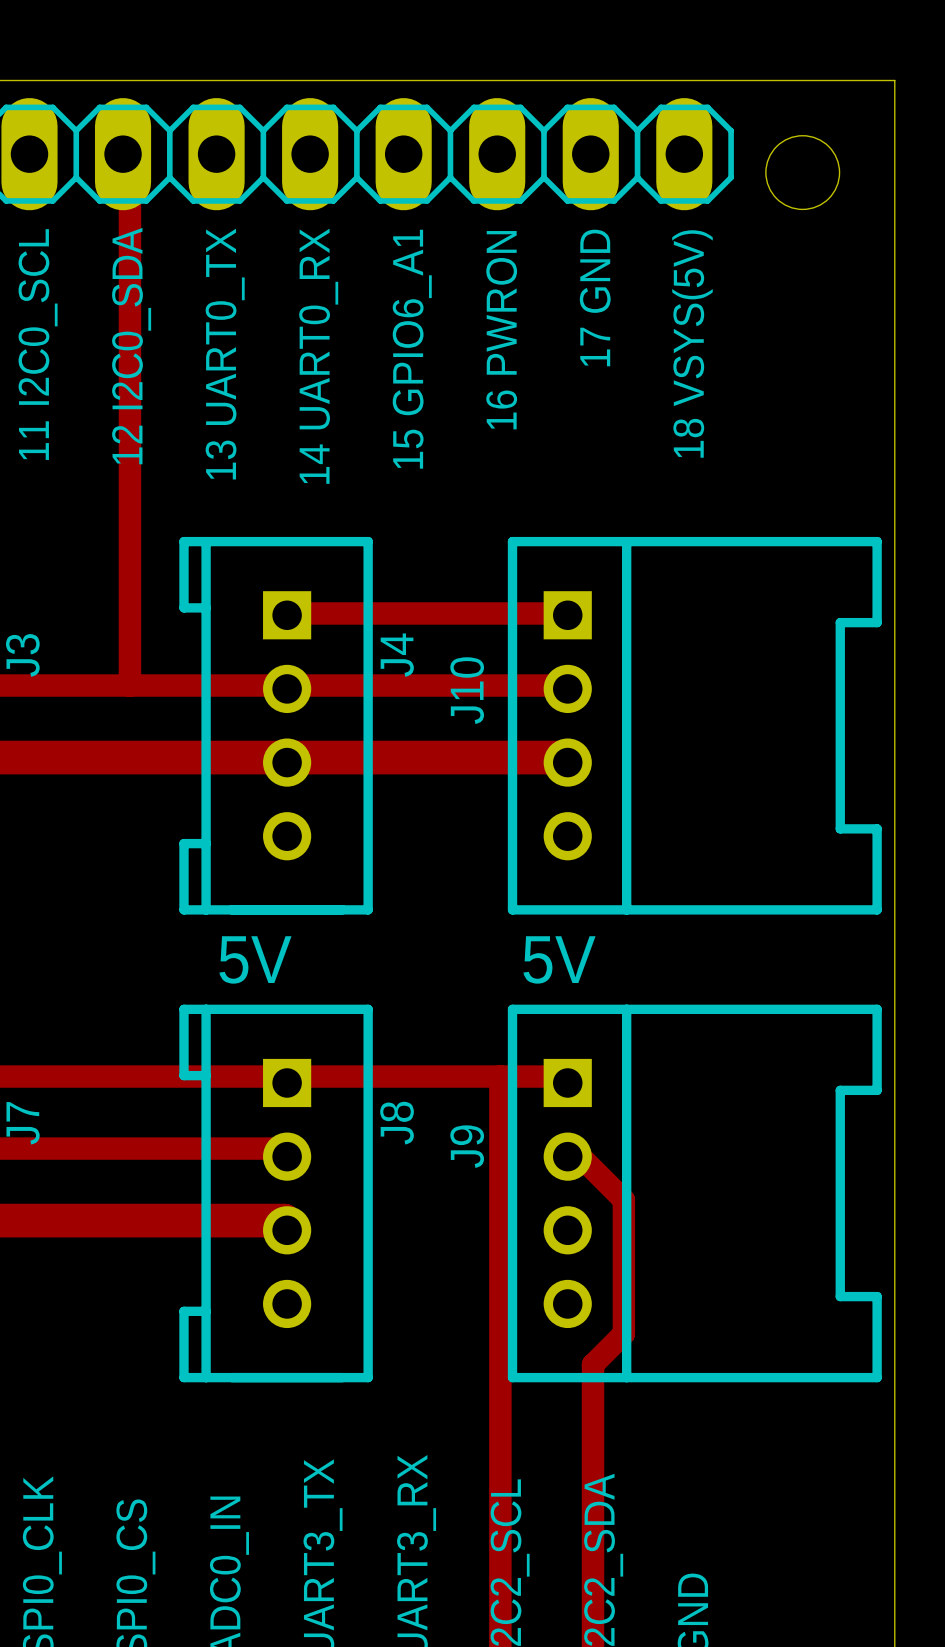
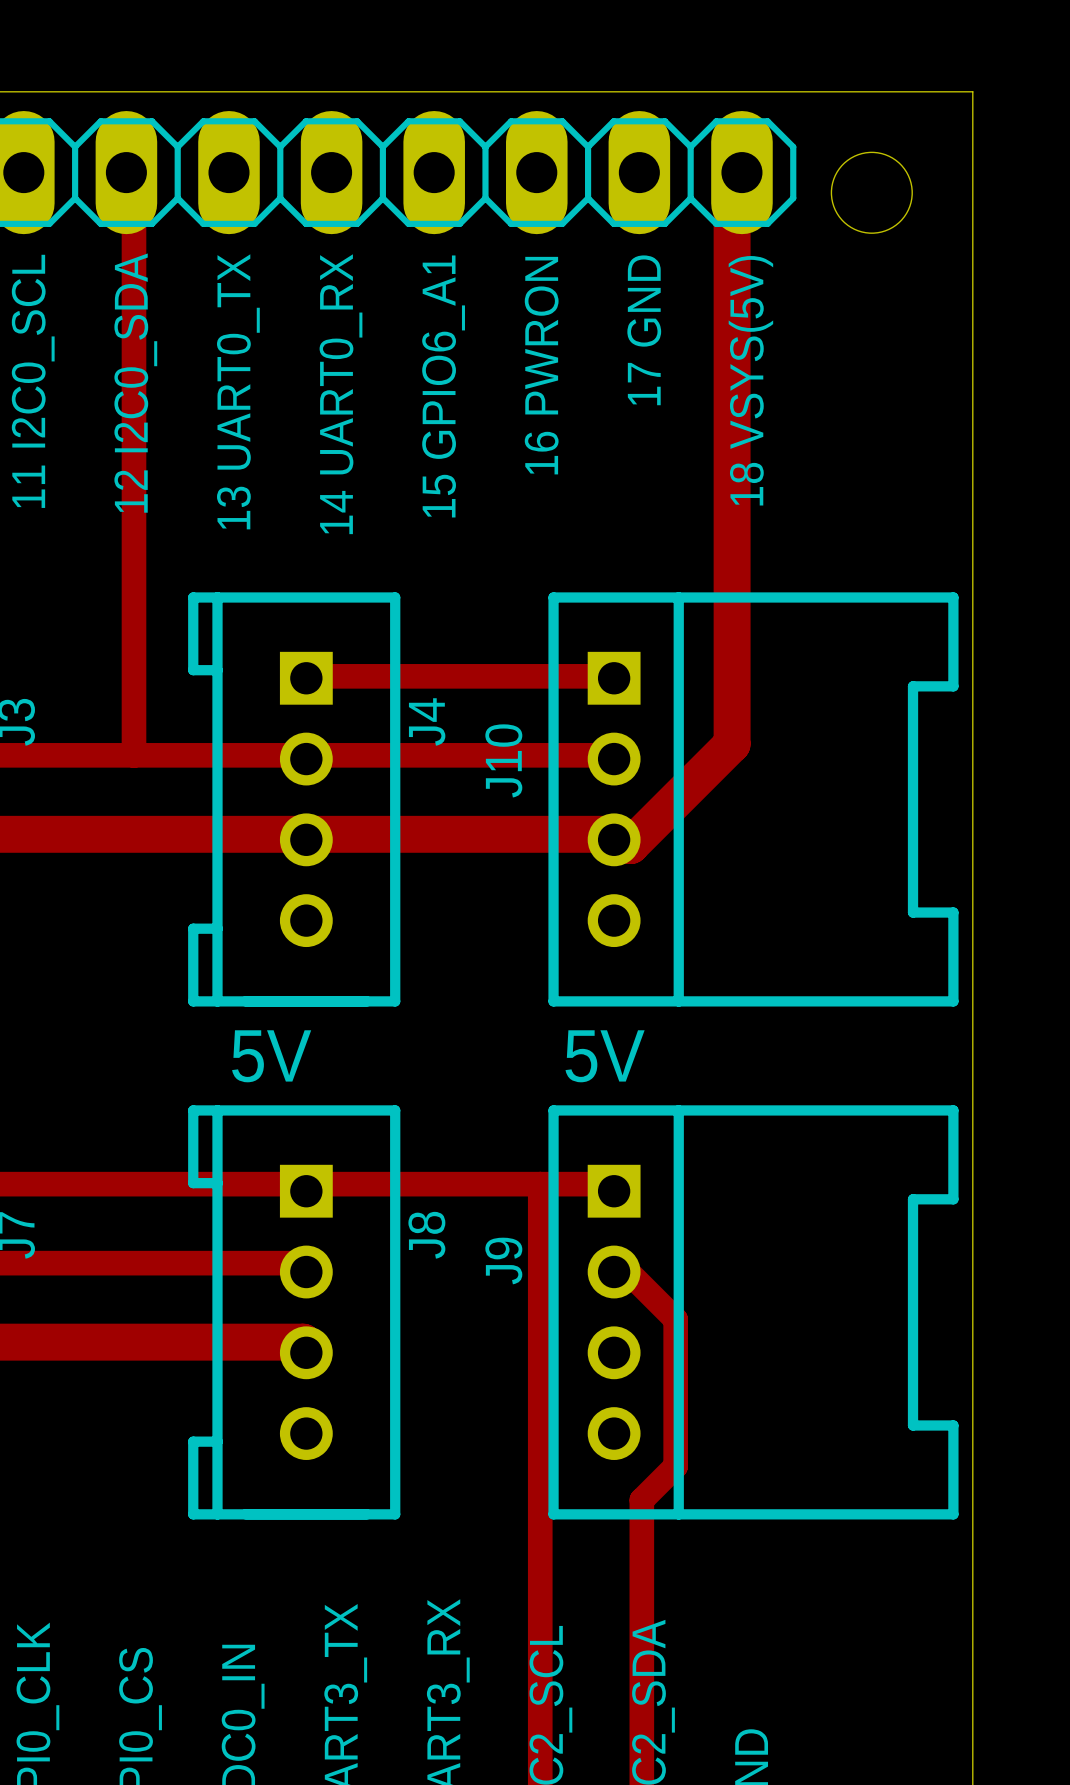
track: none -> (741, 172) (732, 179) (732, 744) (630, 845) (614, 839)

